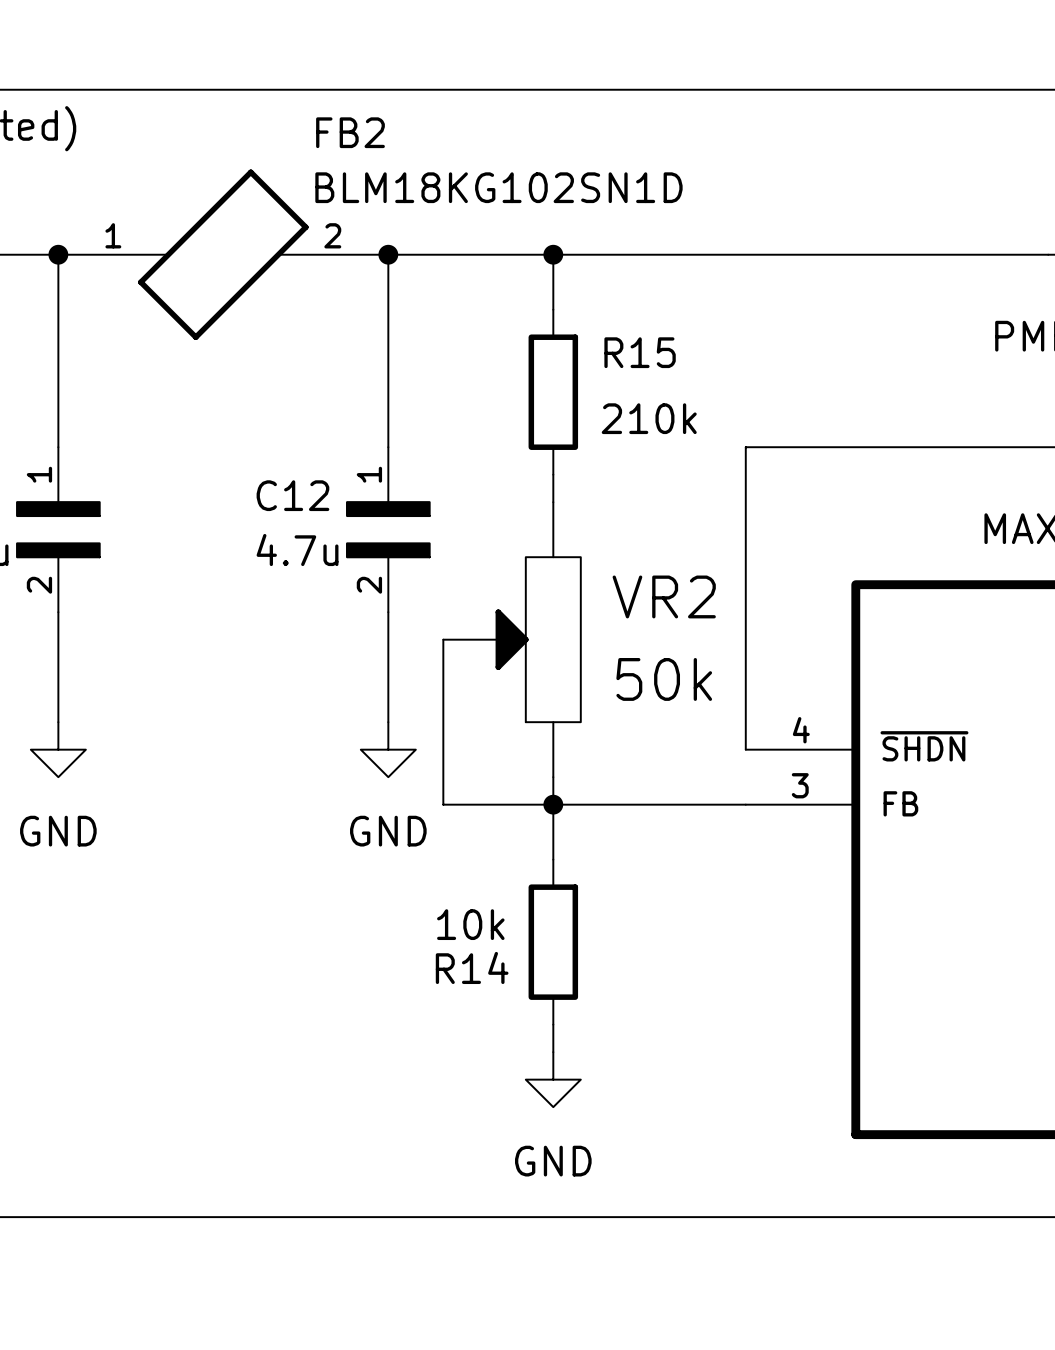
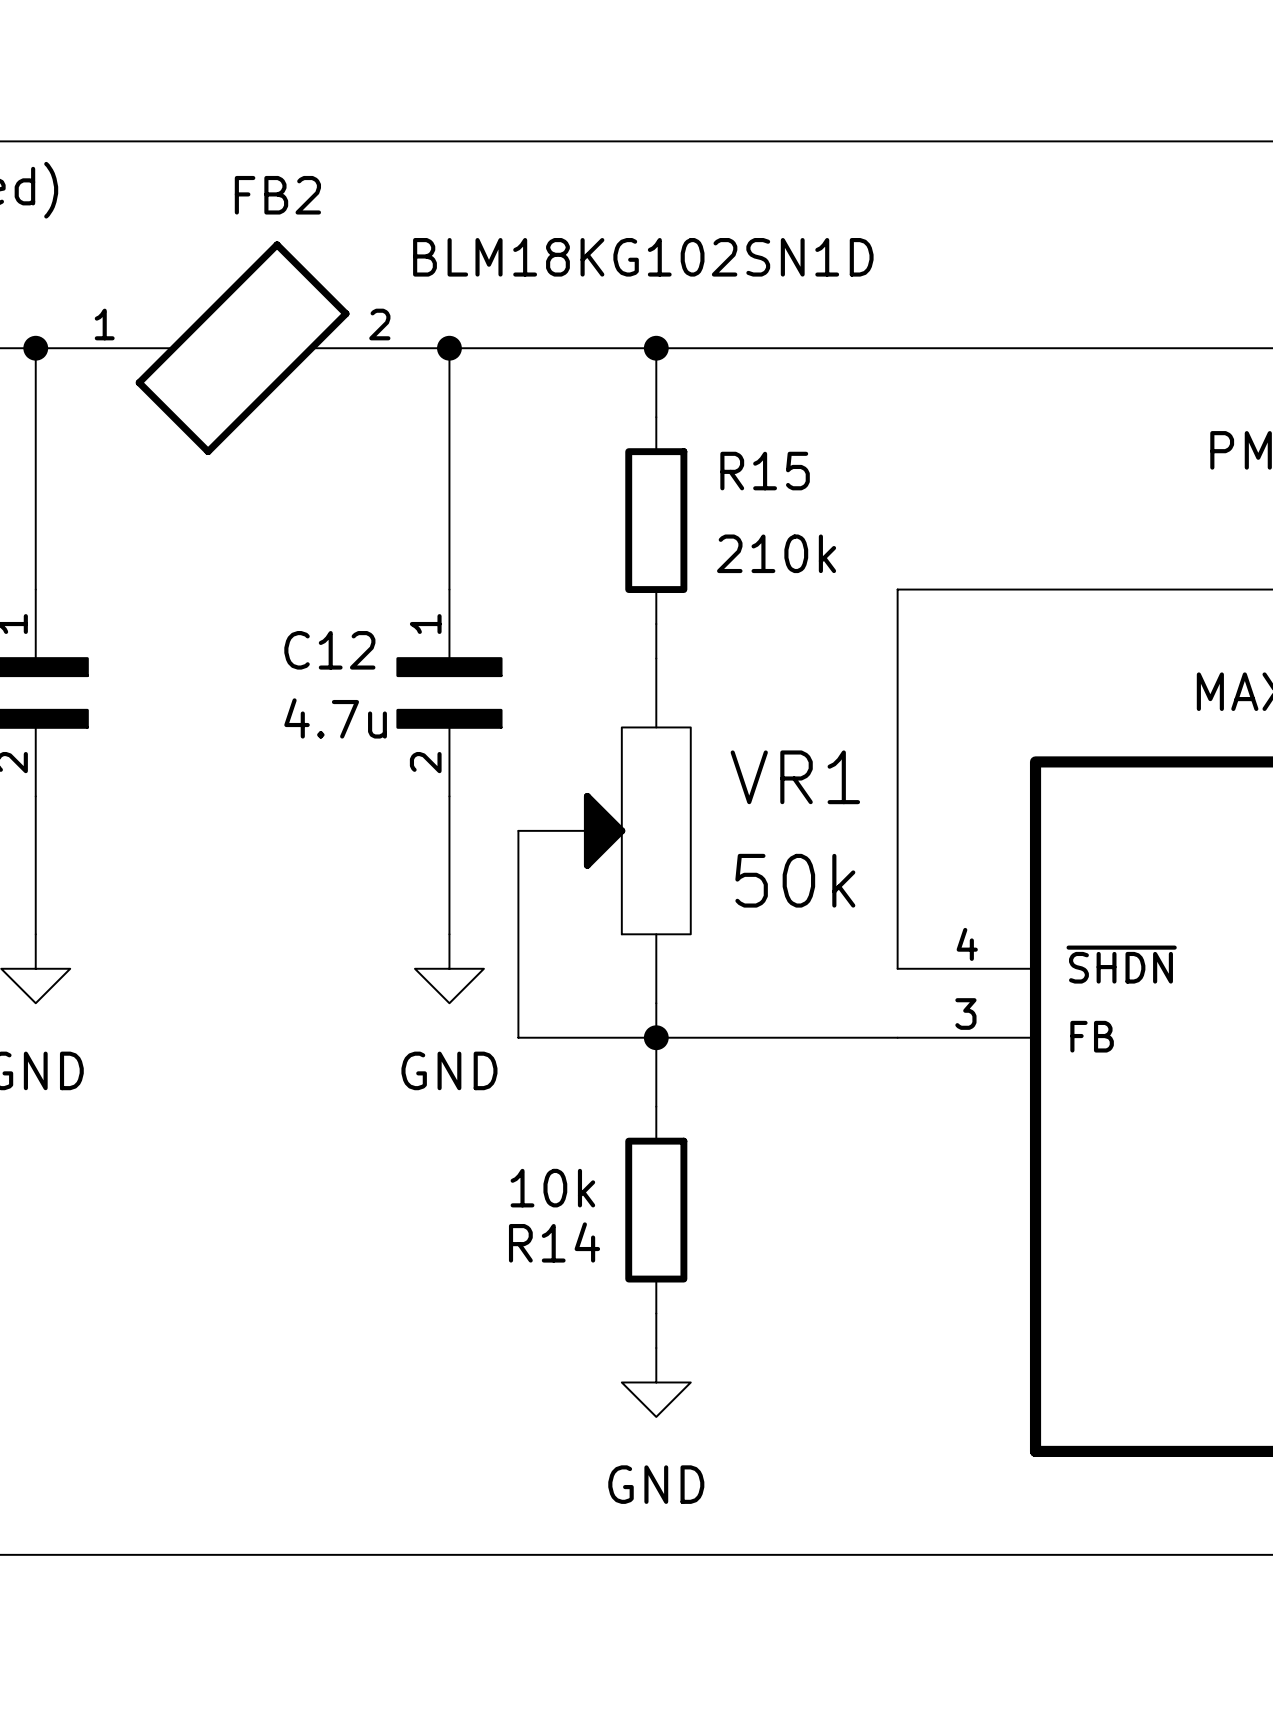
FB2 name position: FB2 (350, 132) -> FB2 (277, 195)
FB2 value position: BLM18KG102SN1D (498, 187) -> BLM18KG102SN1D (643, 257)
VR2 name: VR2 (664, 596) -> VR1 (795, 777)

